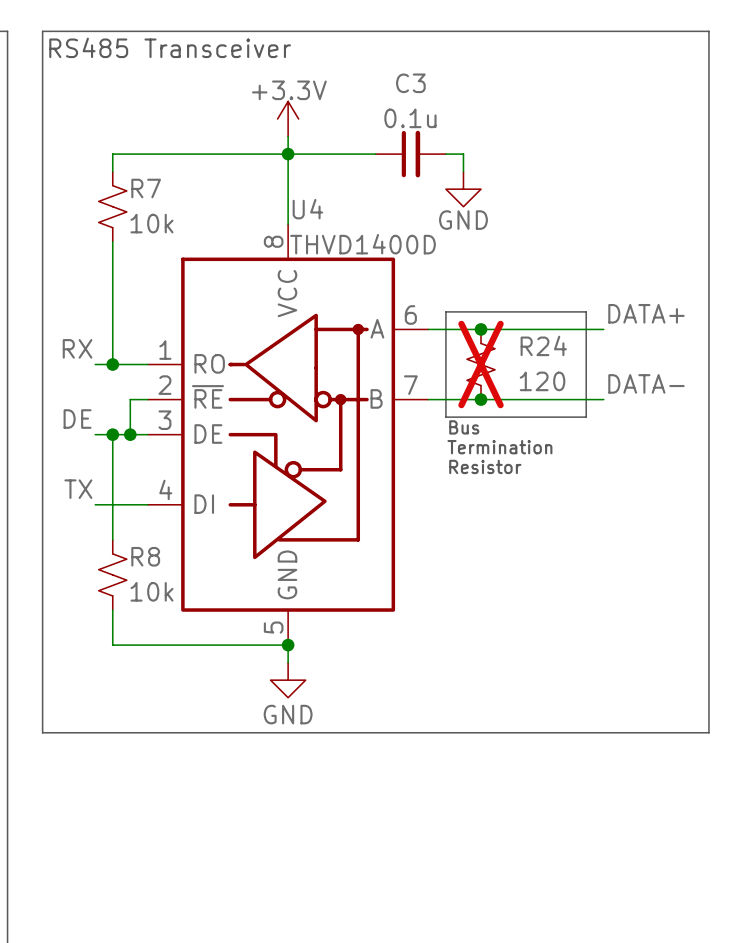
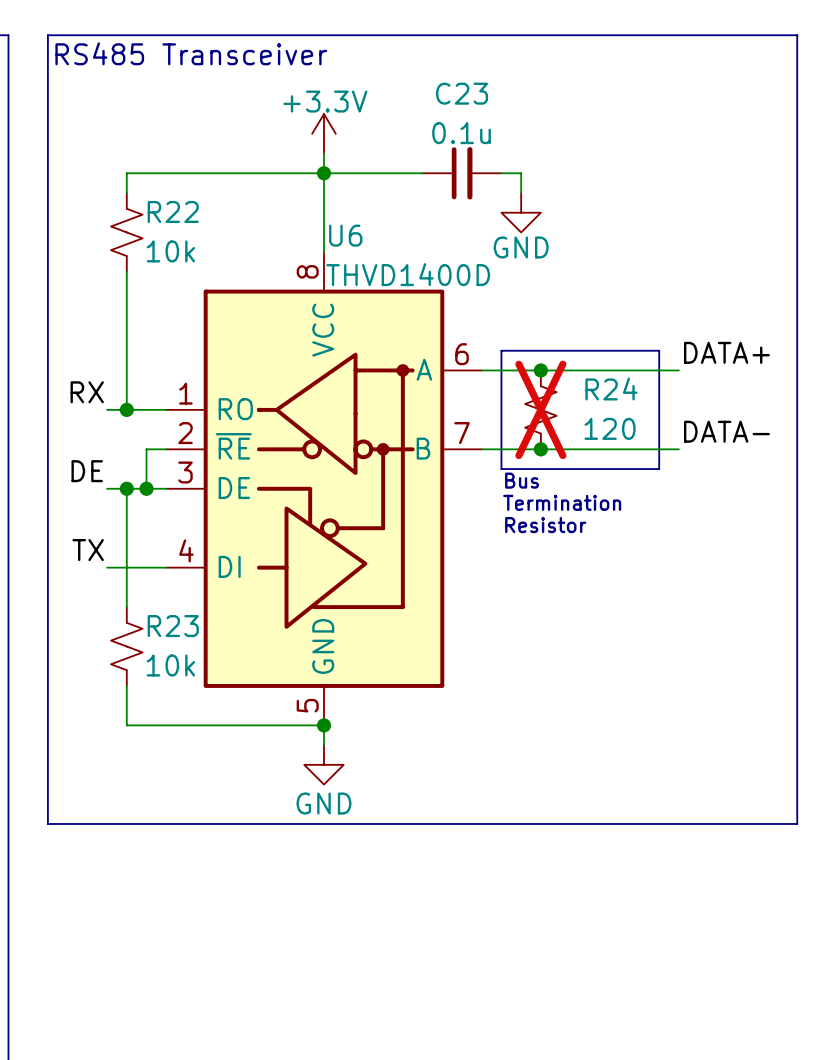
C3 name: C3 (410, 83) -> C23 (462, 93)
R7 name: R7 (146, 188) -> R22 (173, 211)
U4 name: U4 (307, 209) -> U6 (345, 235)
R8 name: R8 (145, 556) -> R23 (173, 626)

